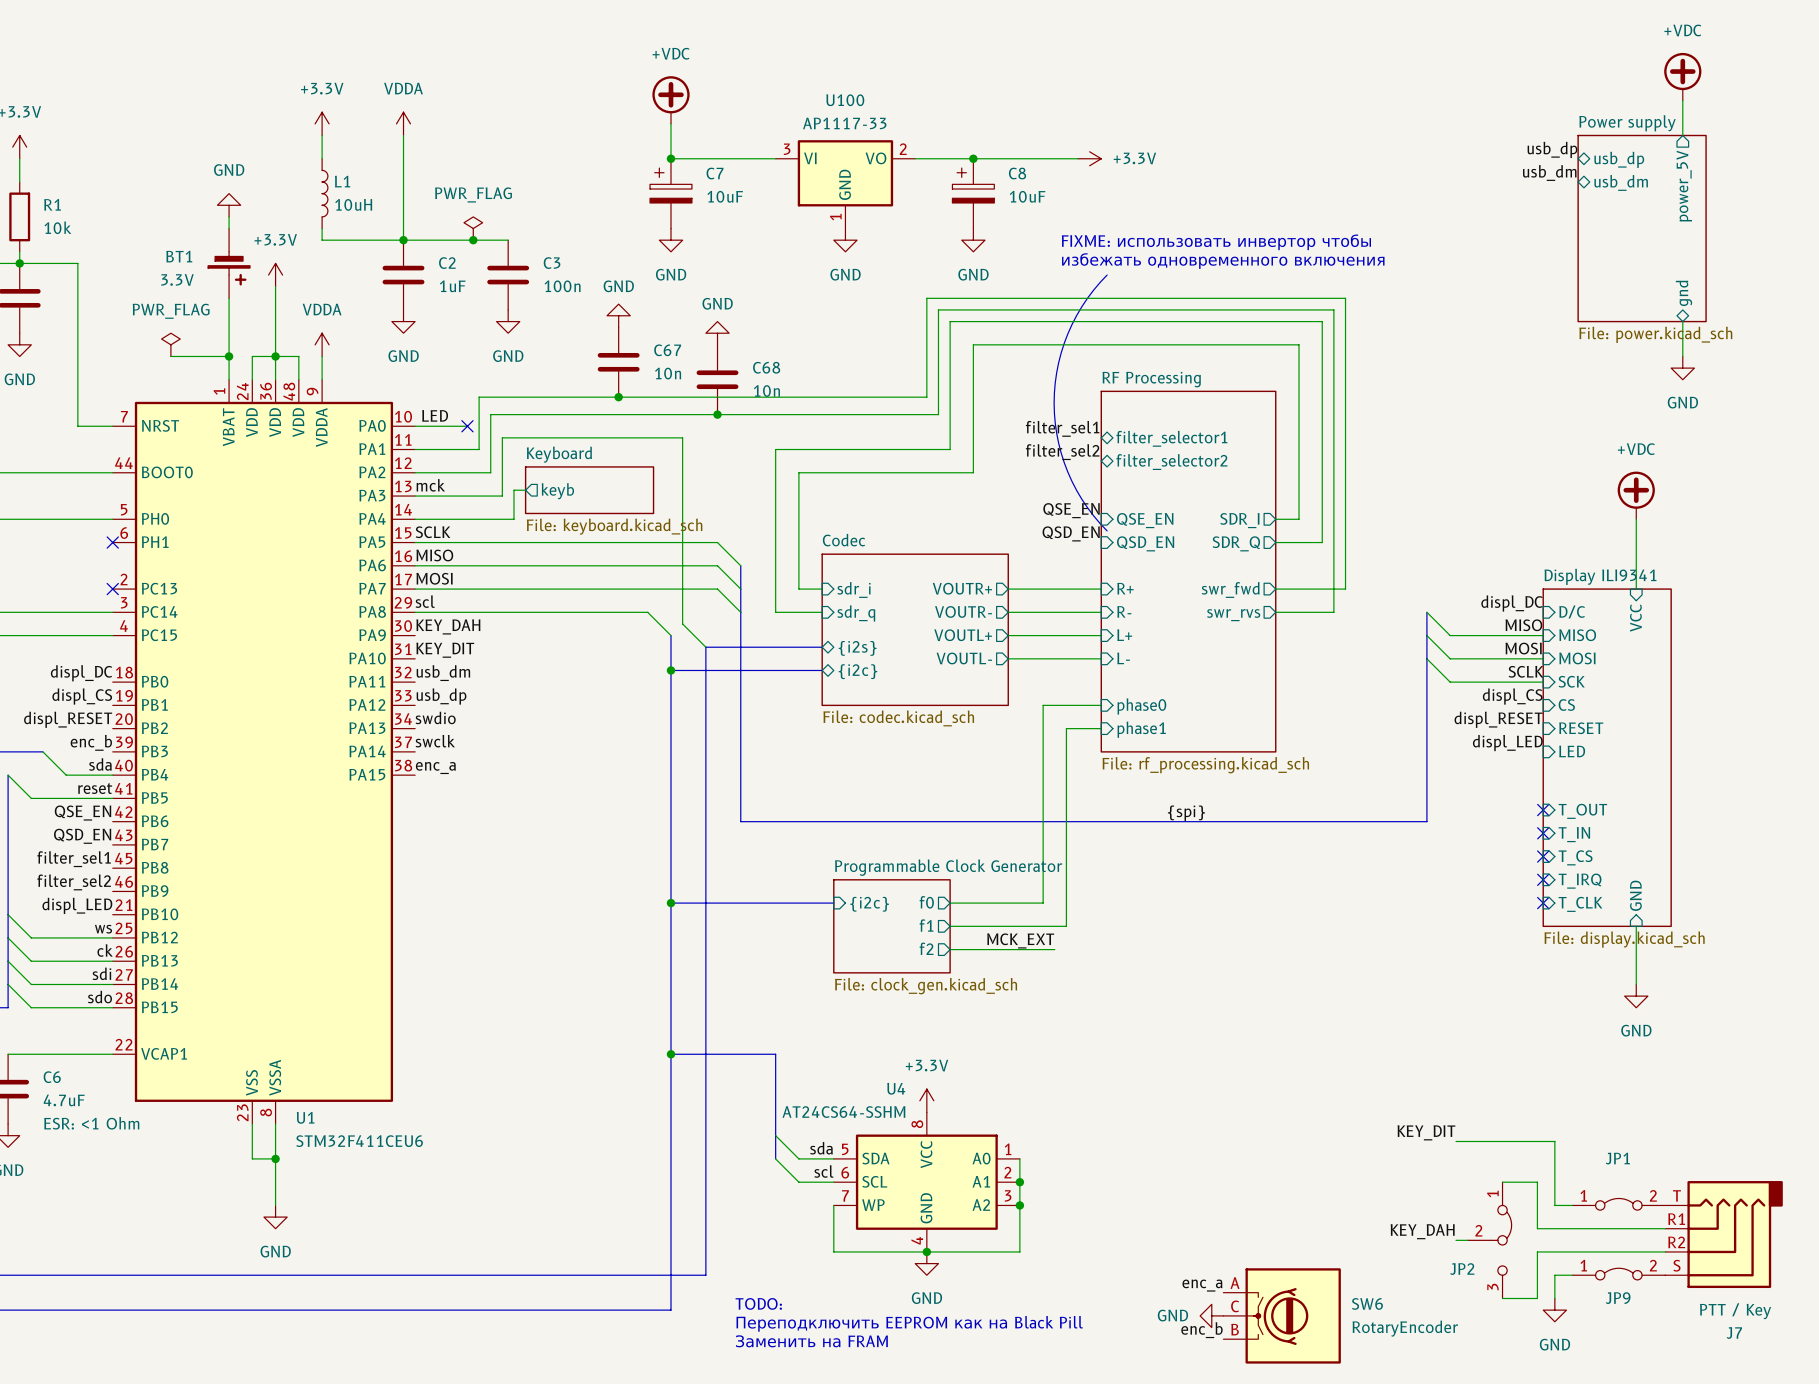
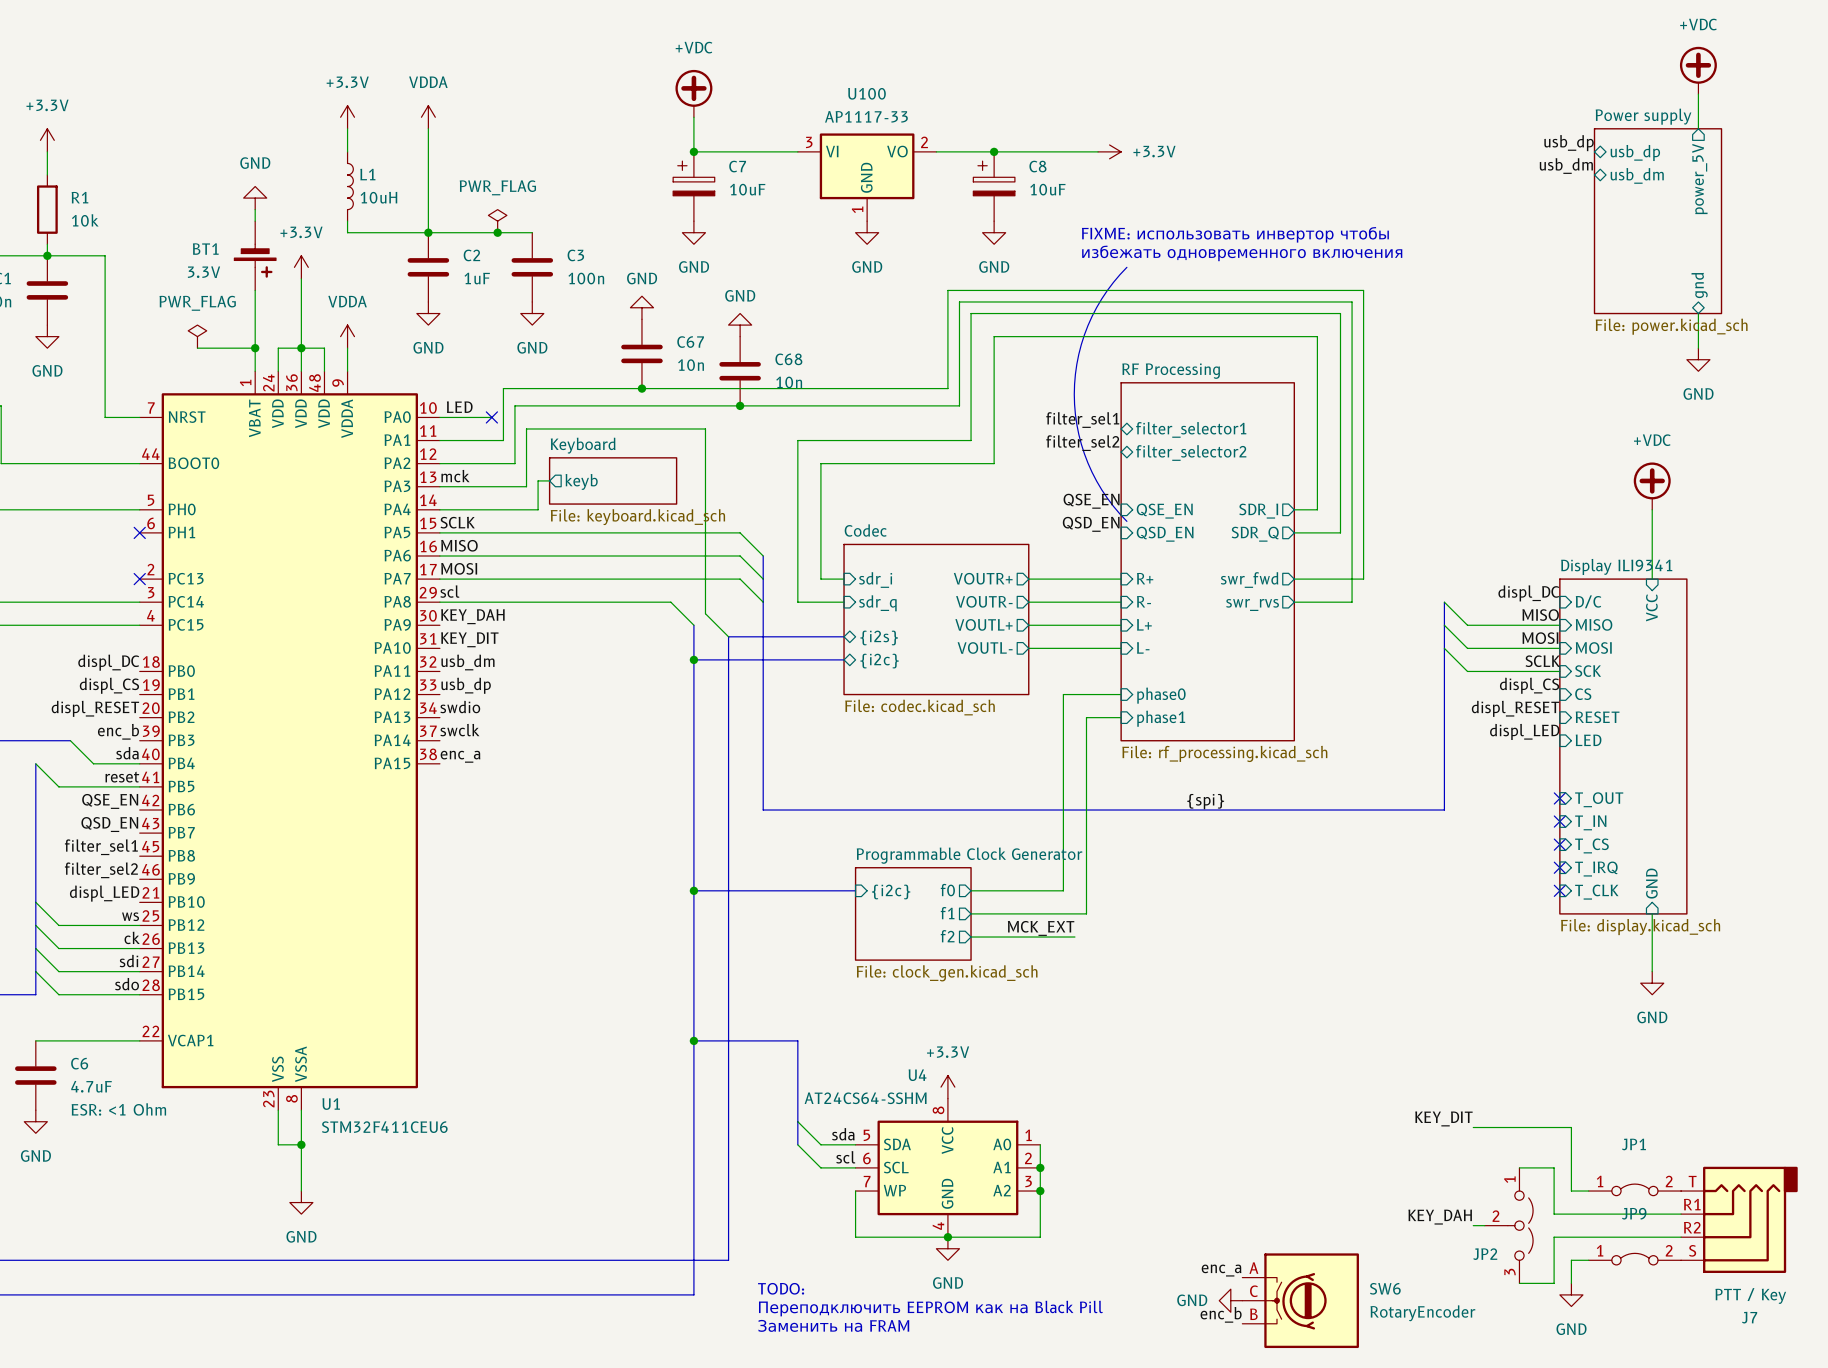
JP2 symbol: [1467, 1182, 1512, 1299] -> [1484, 1167, 1534, 1284]
JP9 name position: JP9 (1618, 1298) -> JP9 (1634, 1213)

